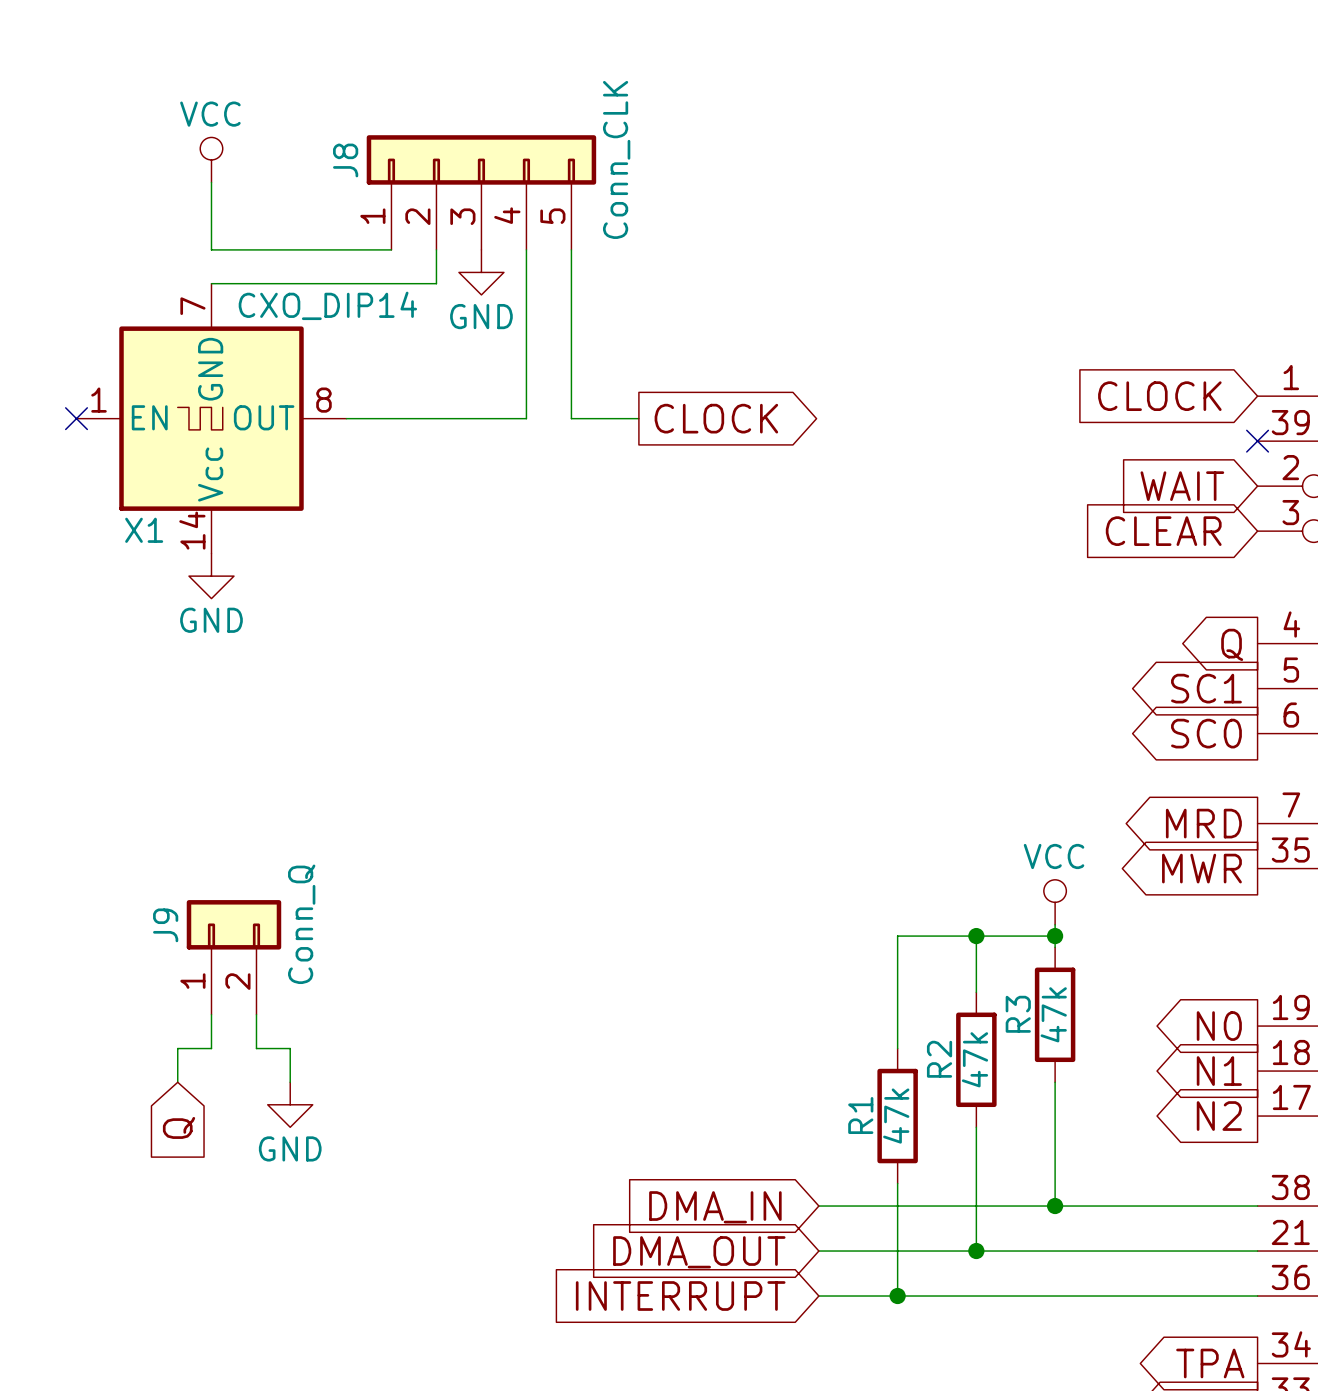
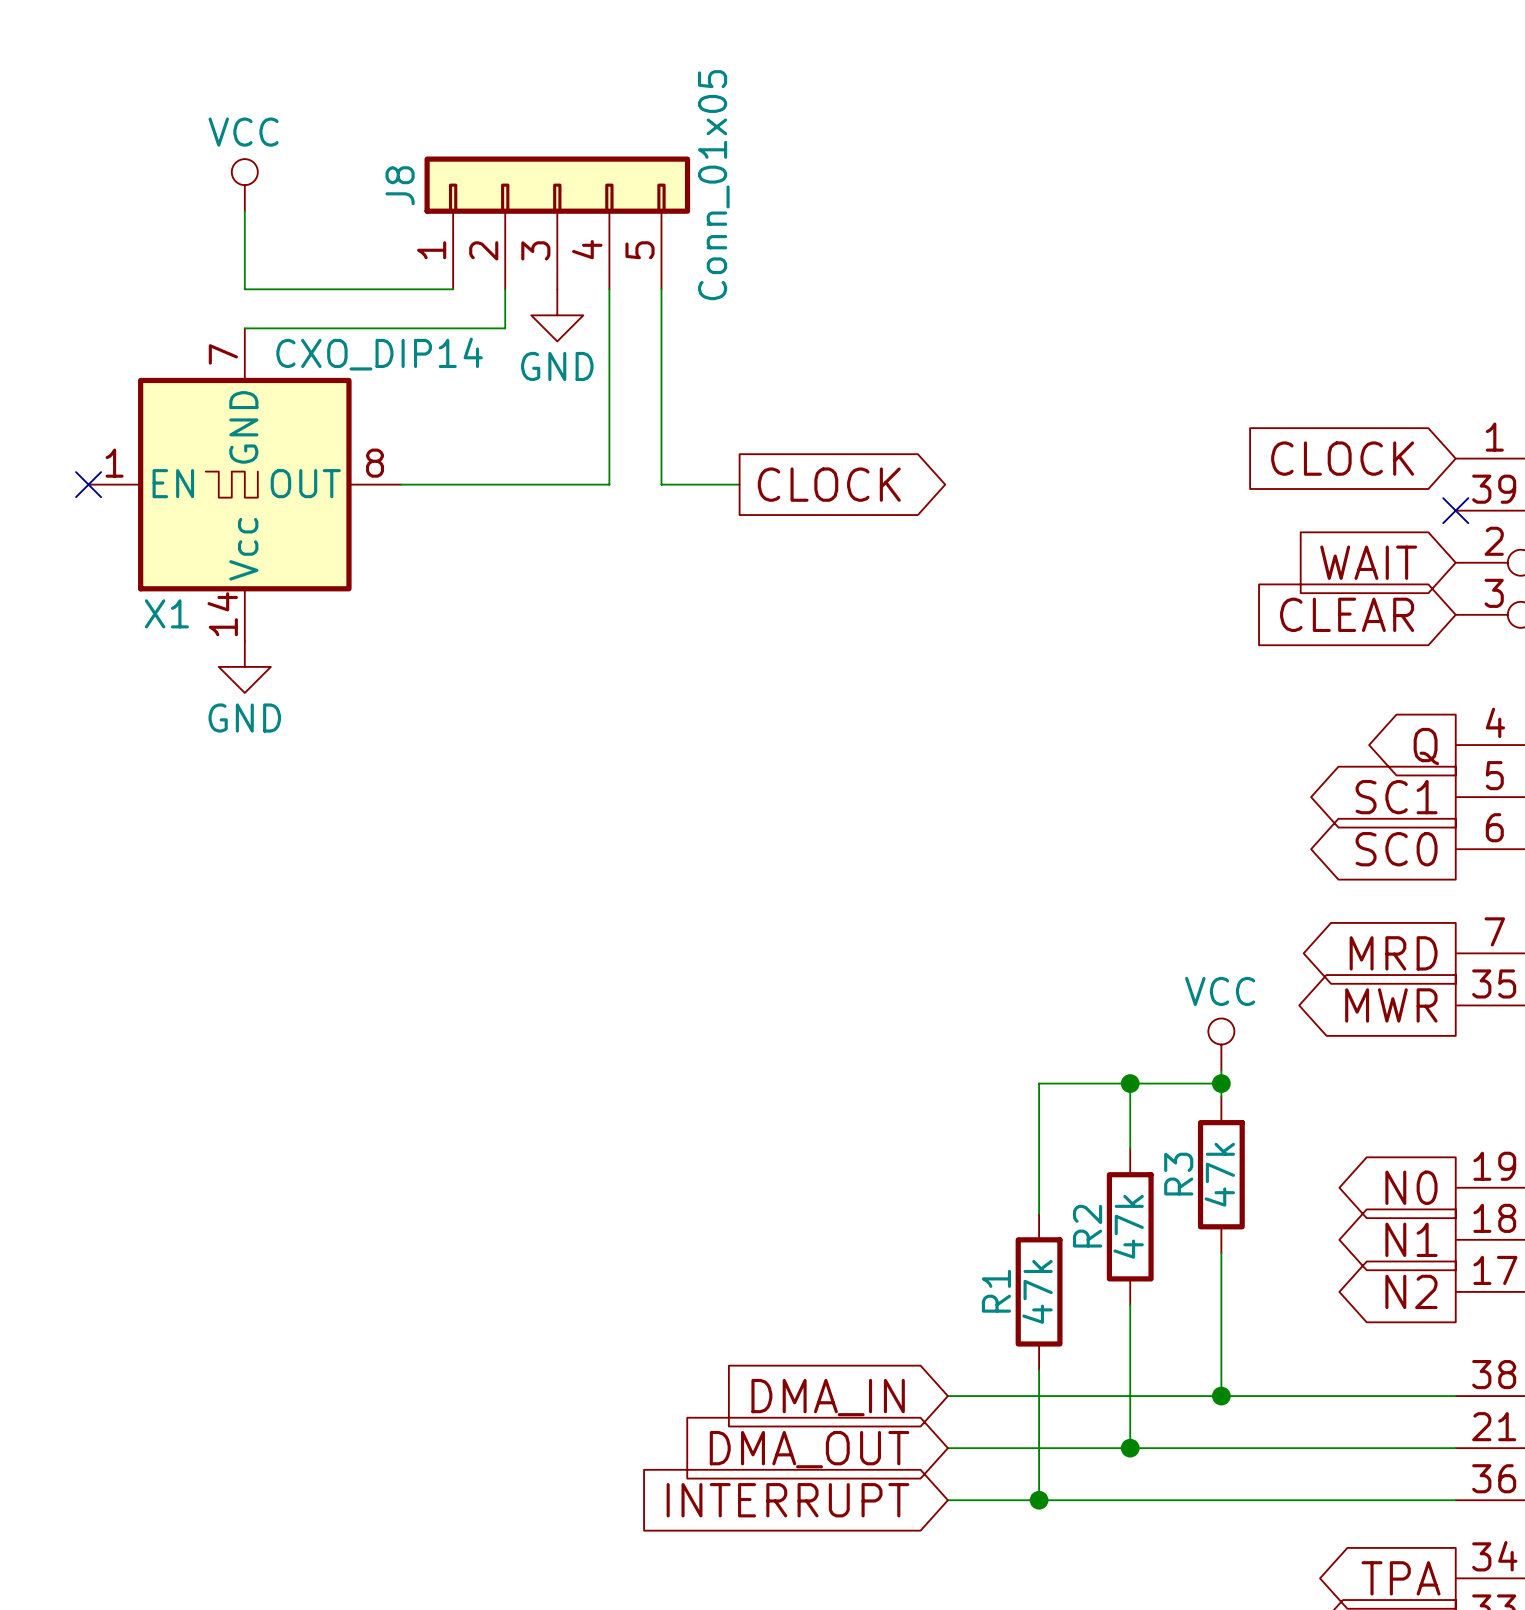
J8 value: Conn_CLK (616, 159) -> Conn_01x05 (713, 185)
J9: Conn_Q (233, 957) -> none
wire: (211, 1014) (211, 1048) (177, 1048) (177, 1082) -> none
wire: (256, 1014) (256, 1048) (290, 1048) (290, 1082) -> none
power symbol: GND (290, 1104) -> none
global label: Q (179, 1127) -> none

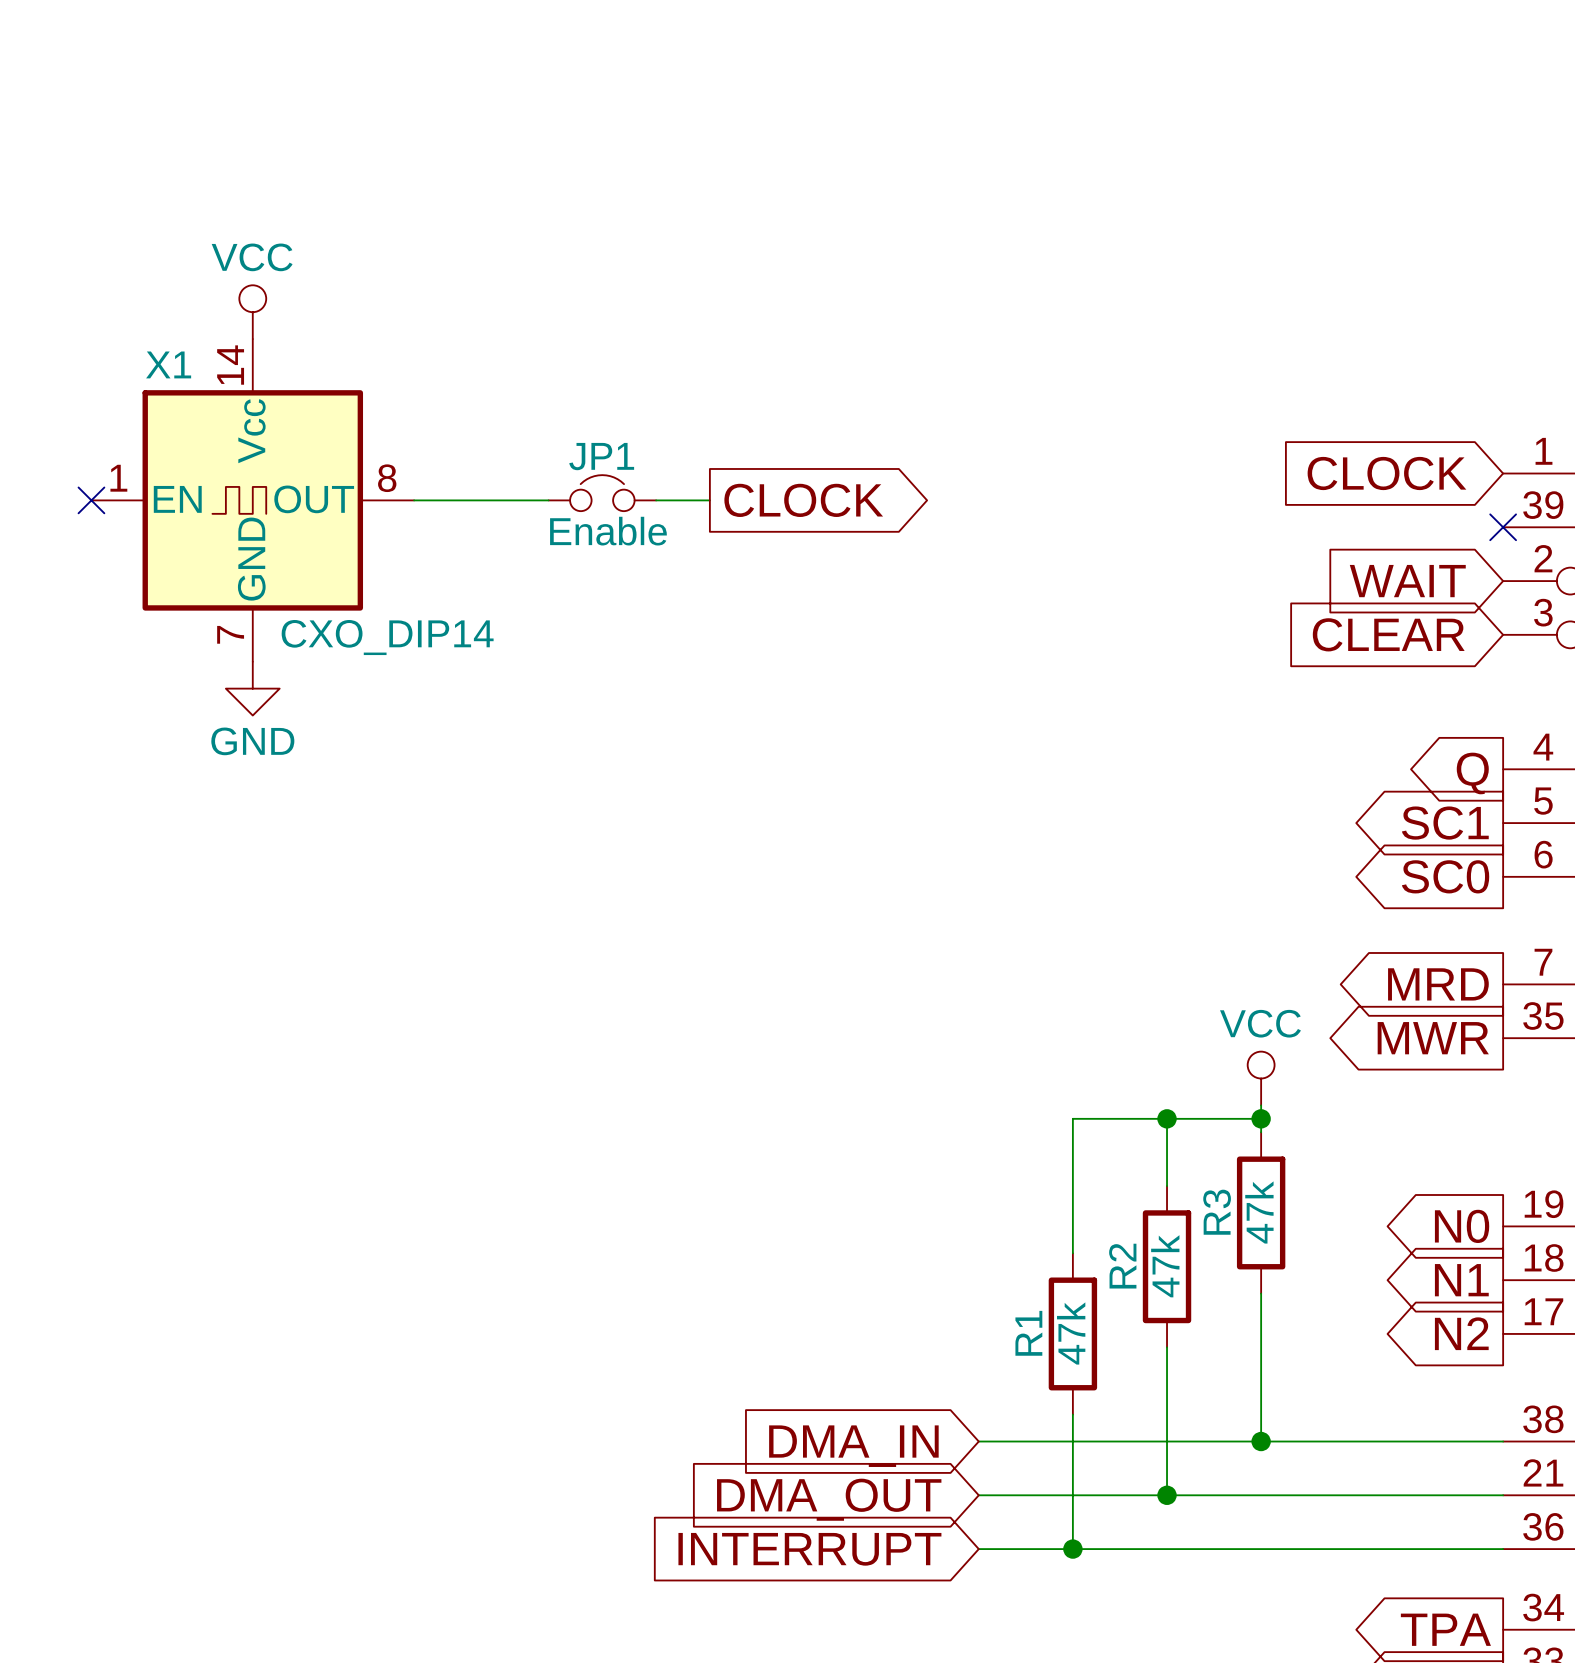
power symbol position: VCC (244, 185) -> VCC (252, 312)
wire: (244, 211) (244, 289) (453, 289) -> none
J8: Conn_01x05 (557, 222) -> none
wire: (505, 289) (505, 328) (244, 328) -> none
wire: (609, 289) (609, 484) (531, 484) -> none
wire: (661, 289) (661, 484) -> (656, 500) (683, 500)
power symbol: GND (557, 315) -> none
JP1: none -> Enable (602, 493)
X1 flip: as is (244, 484) -> up-down (252, 500)
wire: (687, 484) (739, 484) -> none
global label position: CLOCK (829, 484) -> CLOCK (803, 500)

